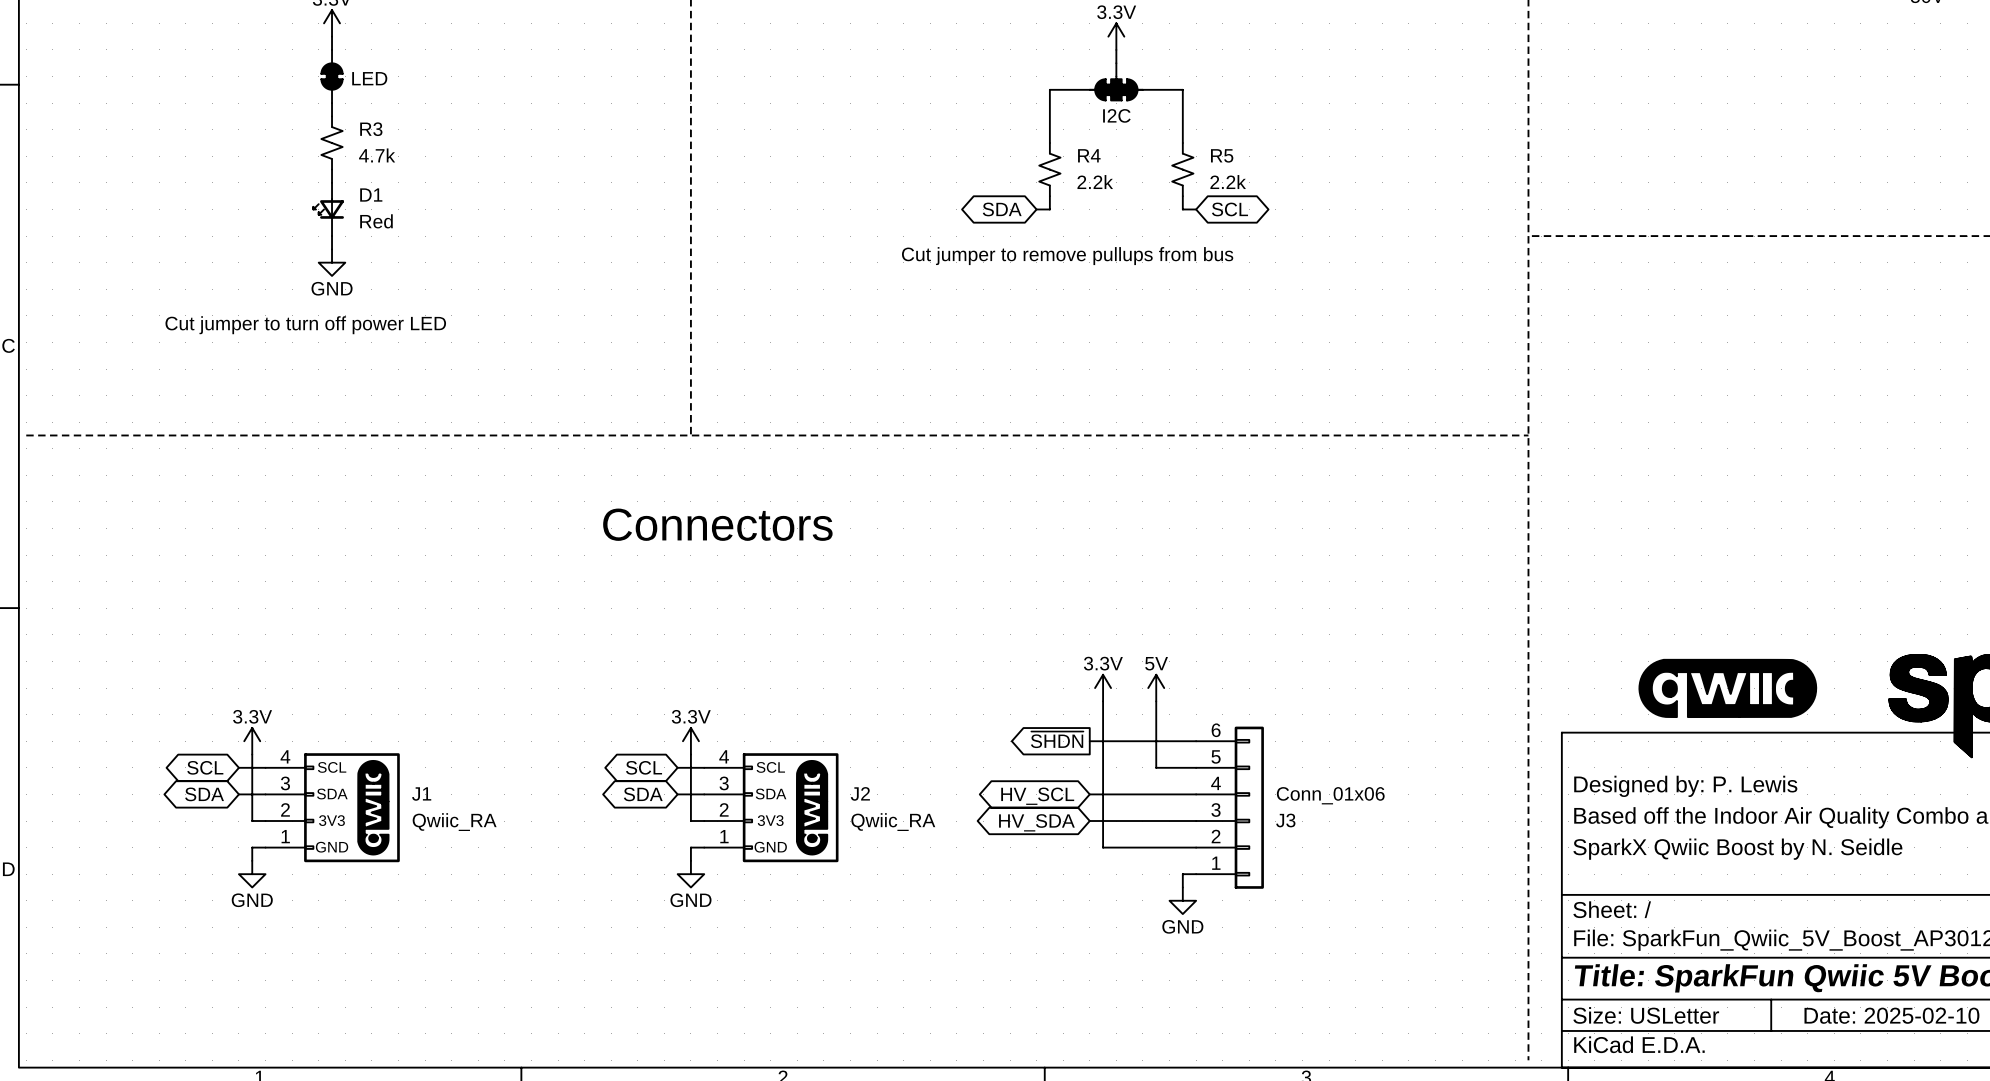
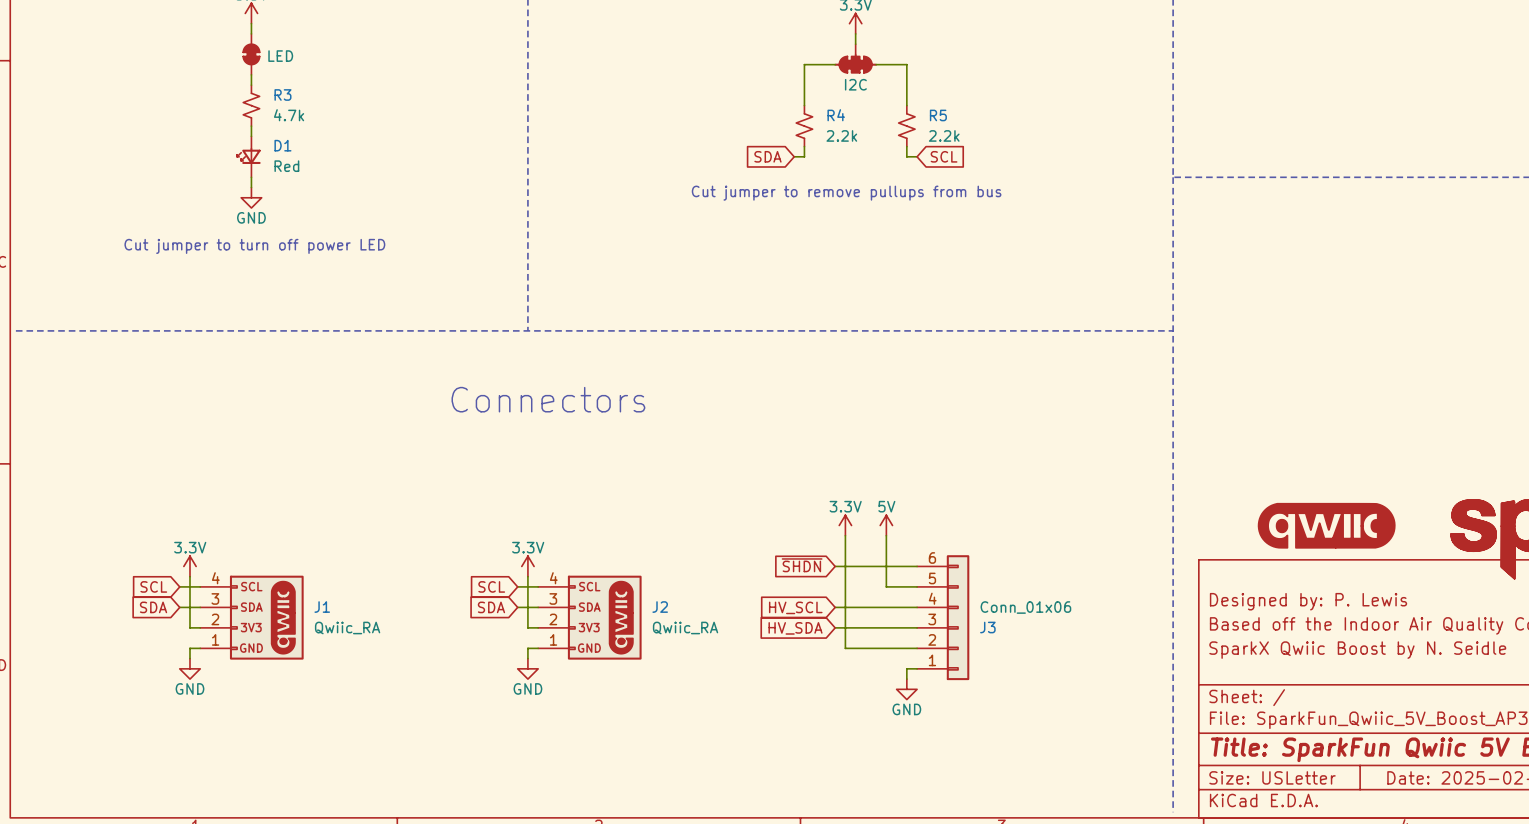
global label shape: bidirectional (1002, 209) -> input (767, 156)
global label shape: bidirectional (1229, 209) -> input (944, 156)
global label shape: output (1057, 739) -> input (802, 565)
global label shape: bidirectional (205, 767) -> input (153, 586)
global label shape: bidirectional (644, 767) -> input (491, 586)
global label shape: bidirectional (204, 794) -> input (153, 607)
global label shape: bidirectional (643, 794) -> input (491, 607)
global label shape: bidirectional (1037, 796) -> input (795, 607)
global label shape: bidirectional (1036, 822) -> input (795, 628)

